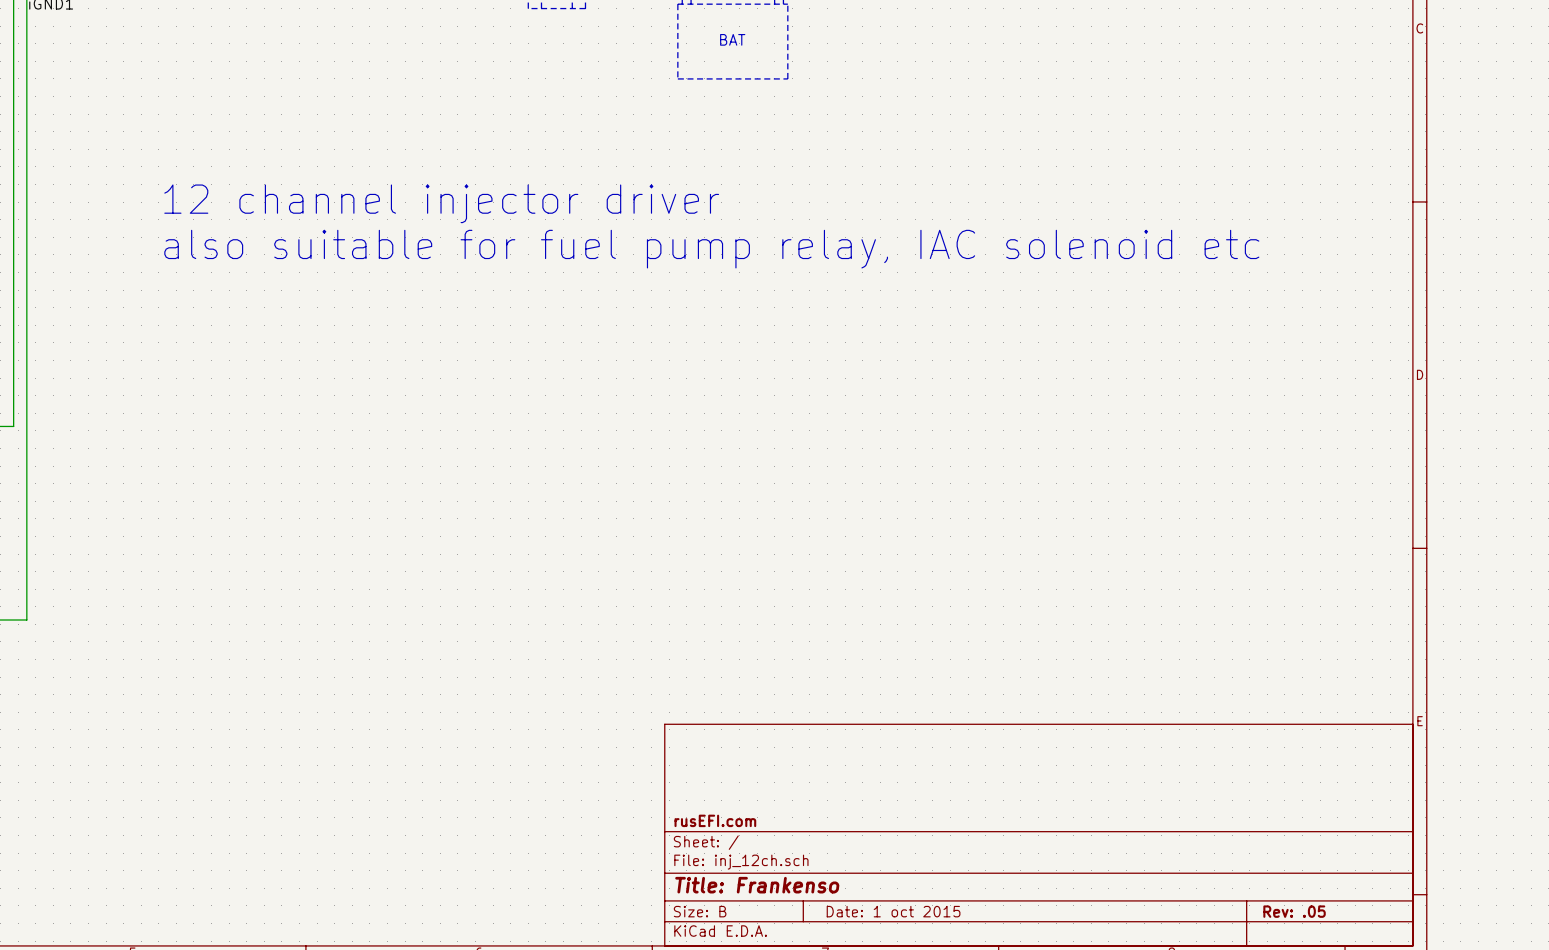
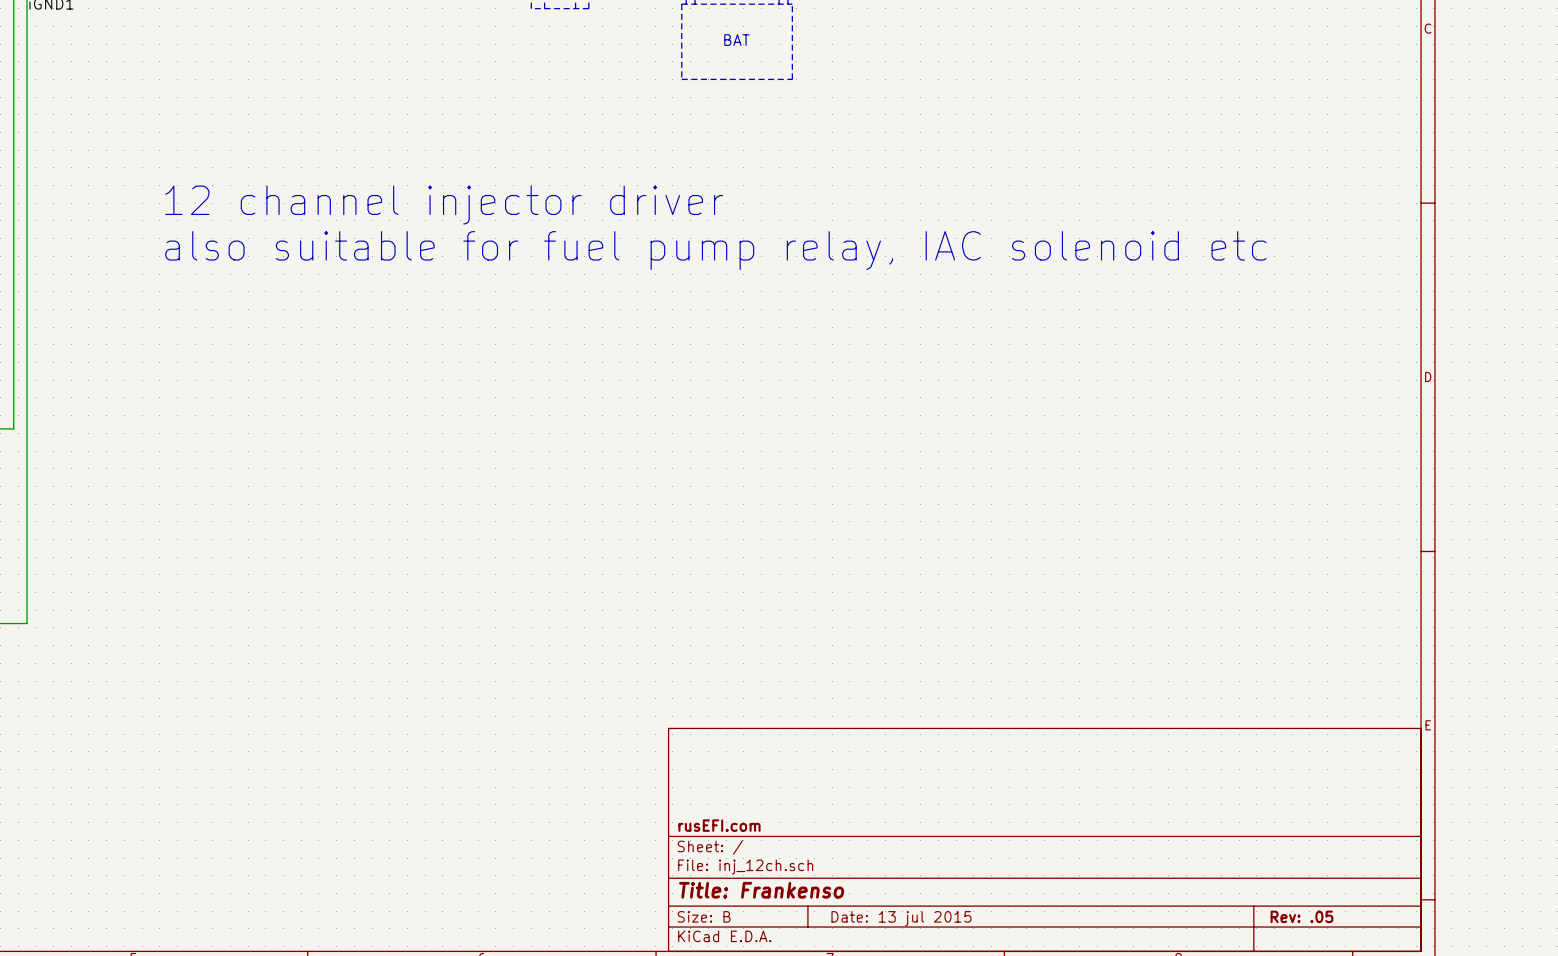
title block: Date: 1 oct 2015 (893, 911) -> Date: 13 jul 2015 (901, 918)

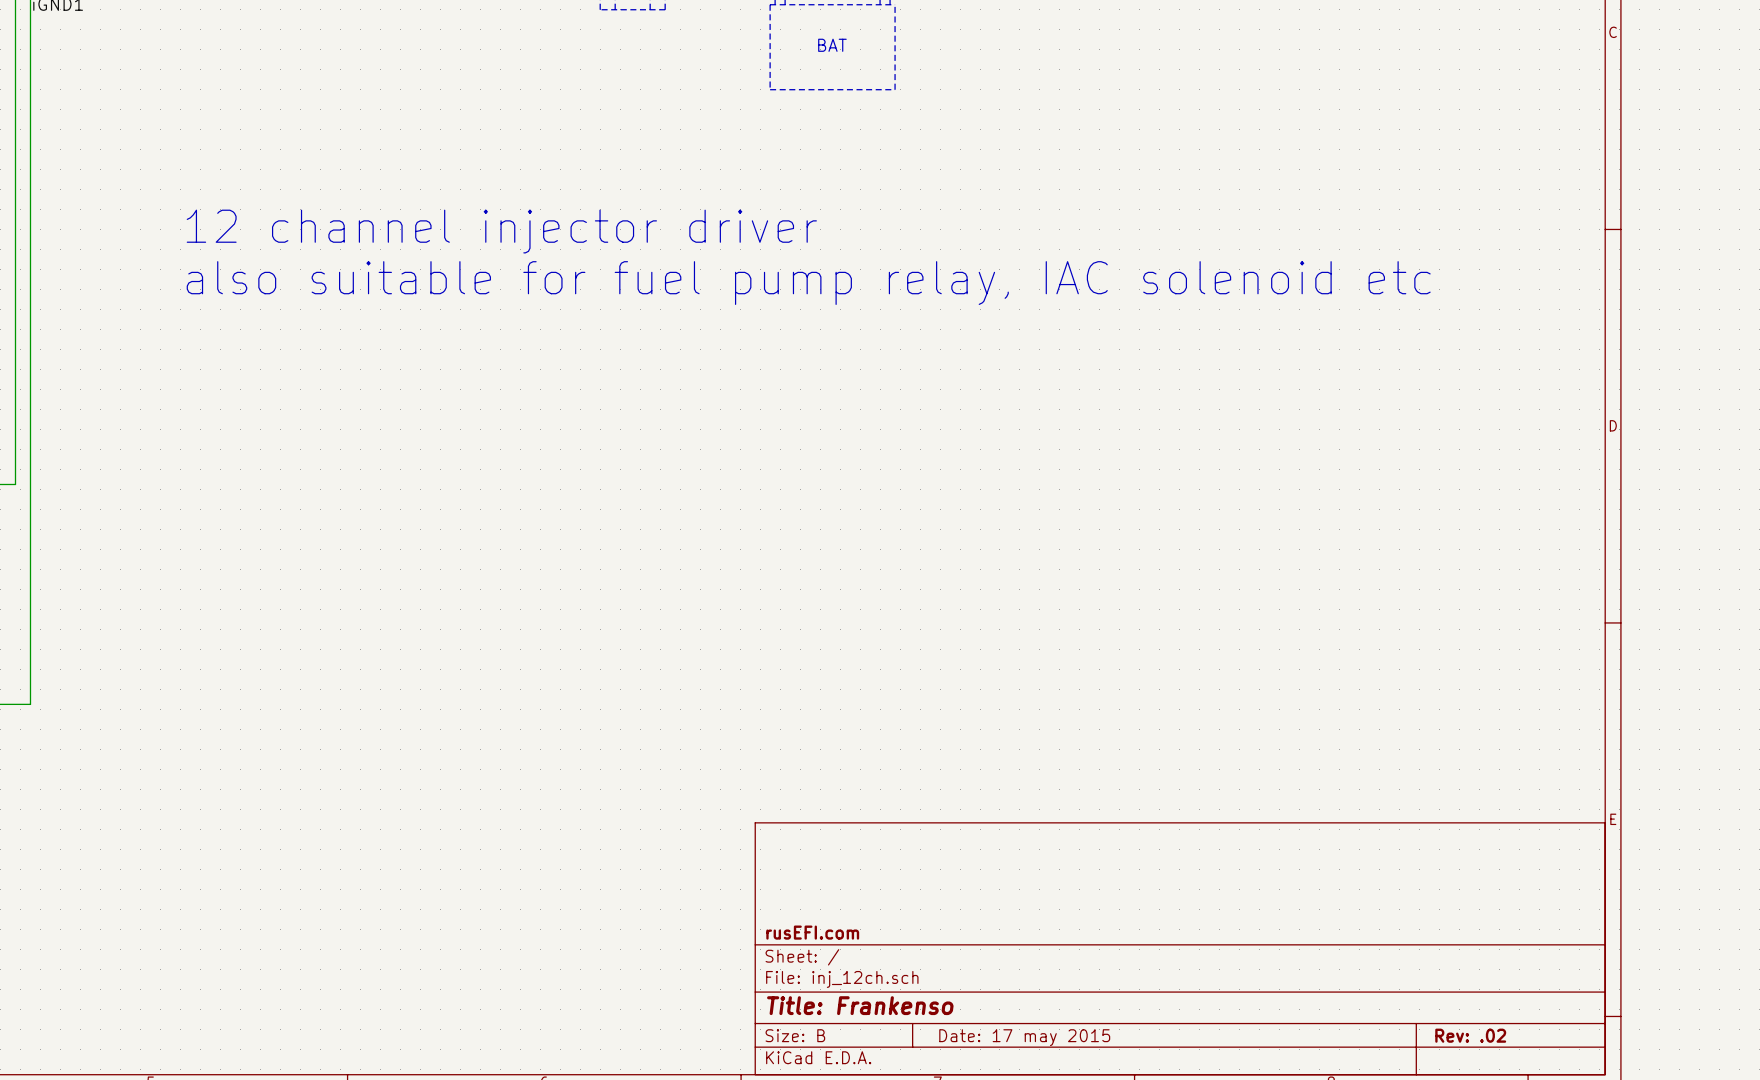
title block: Rev: .05 (1301, 916) -> Rev: .02 (1470, 1035)
title block: Date: 13 jul 2015 (901, 918) -> Date: 17 may 2015 (1024, 1037)

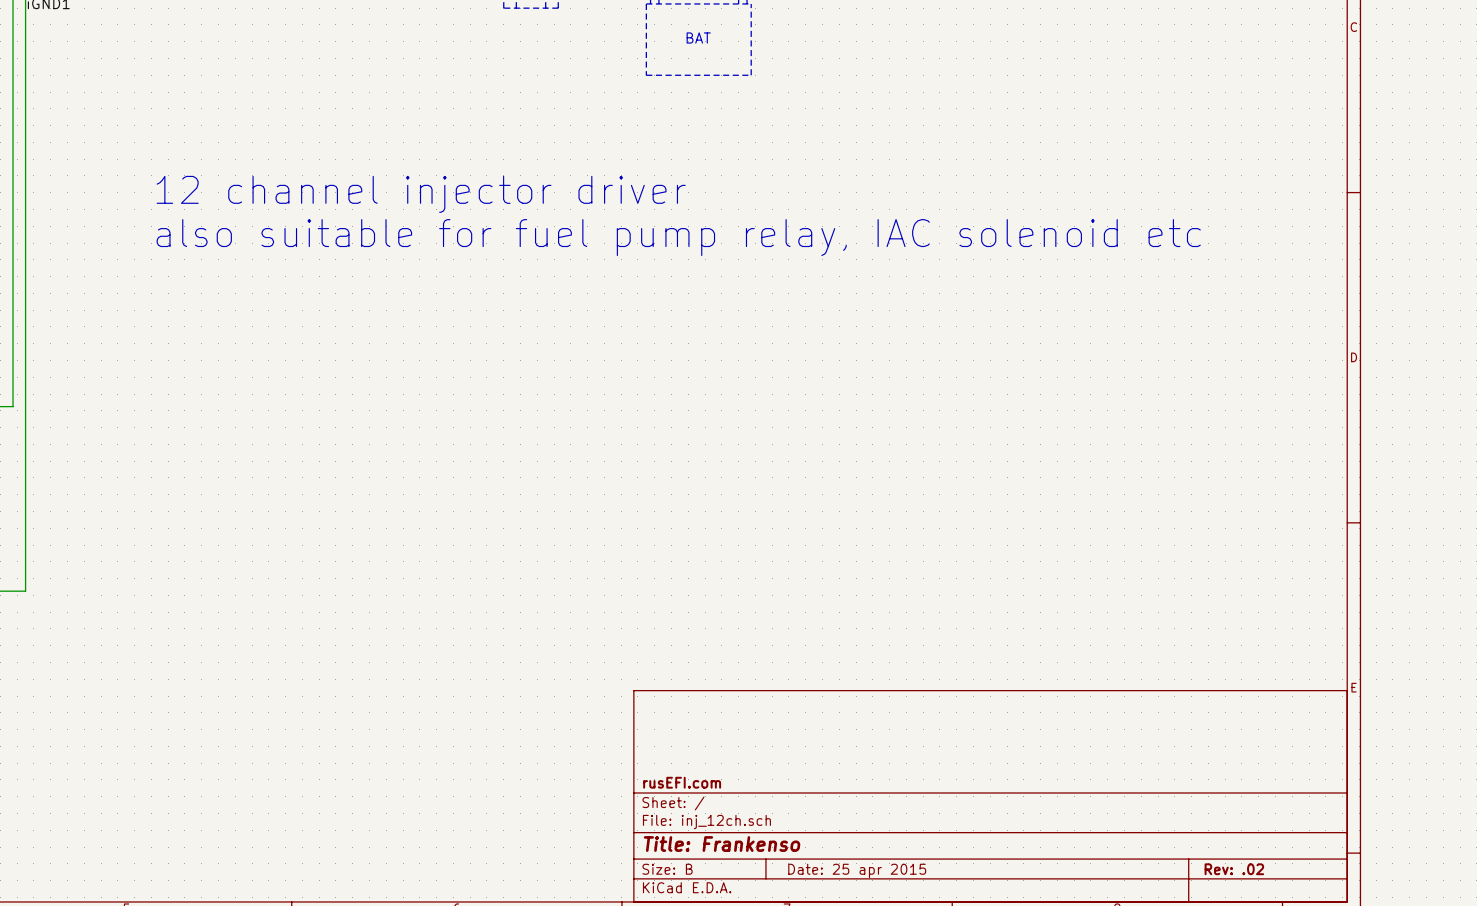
title block: Date: 17 may 2015 (1024, 1037) -> Date: 25 apr 2015 (857, 870)

